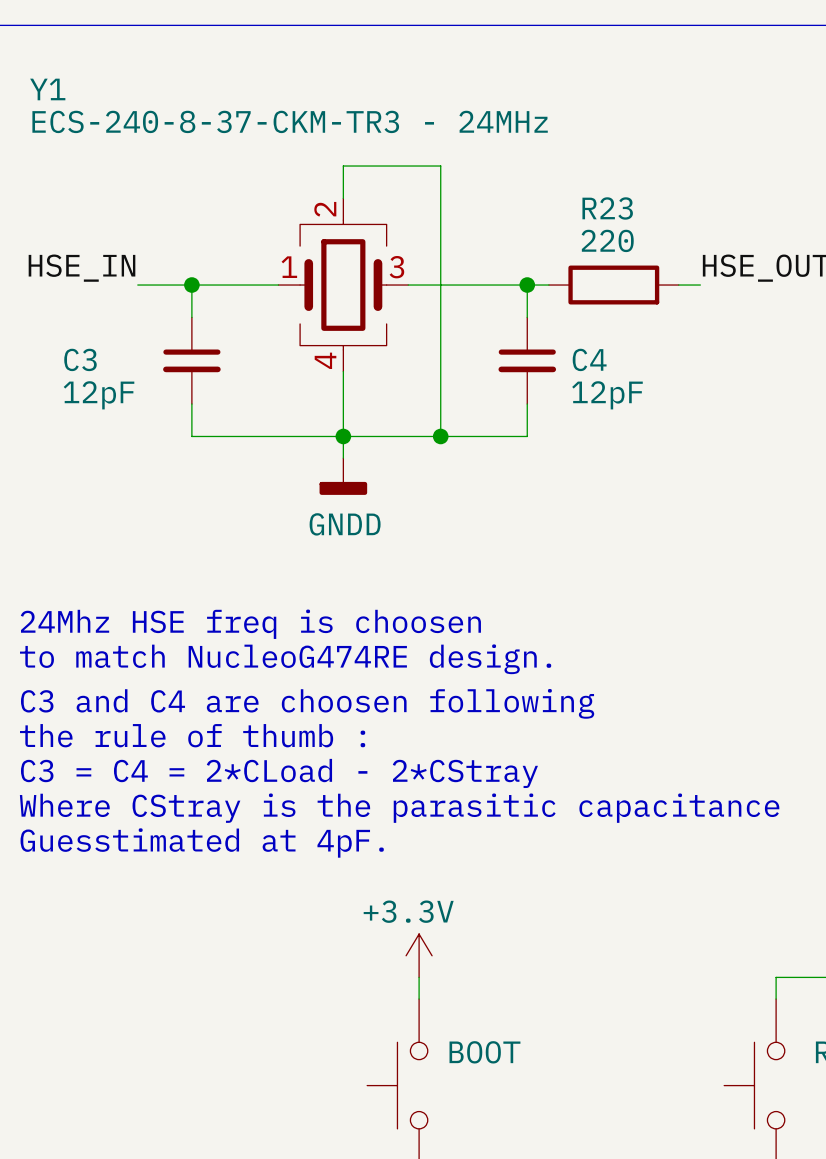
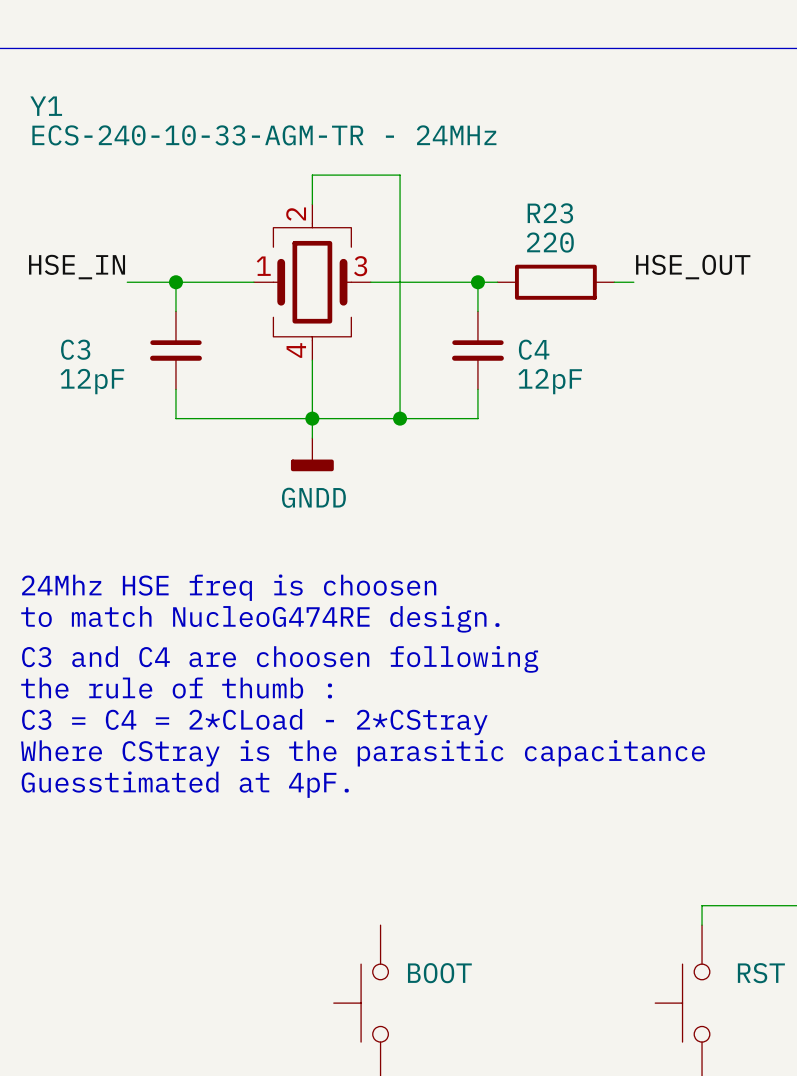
Y1 value: ECS-240-8-37-CKM-TR3 - 24MHz (290, 121) -> ECS-240-10-33-AGM-TR - 24MHz (264, 135)
power symbol: +3.3V (419, 955) -> none
wire: (419, 977) (419, 999) -> none

